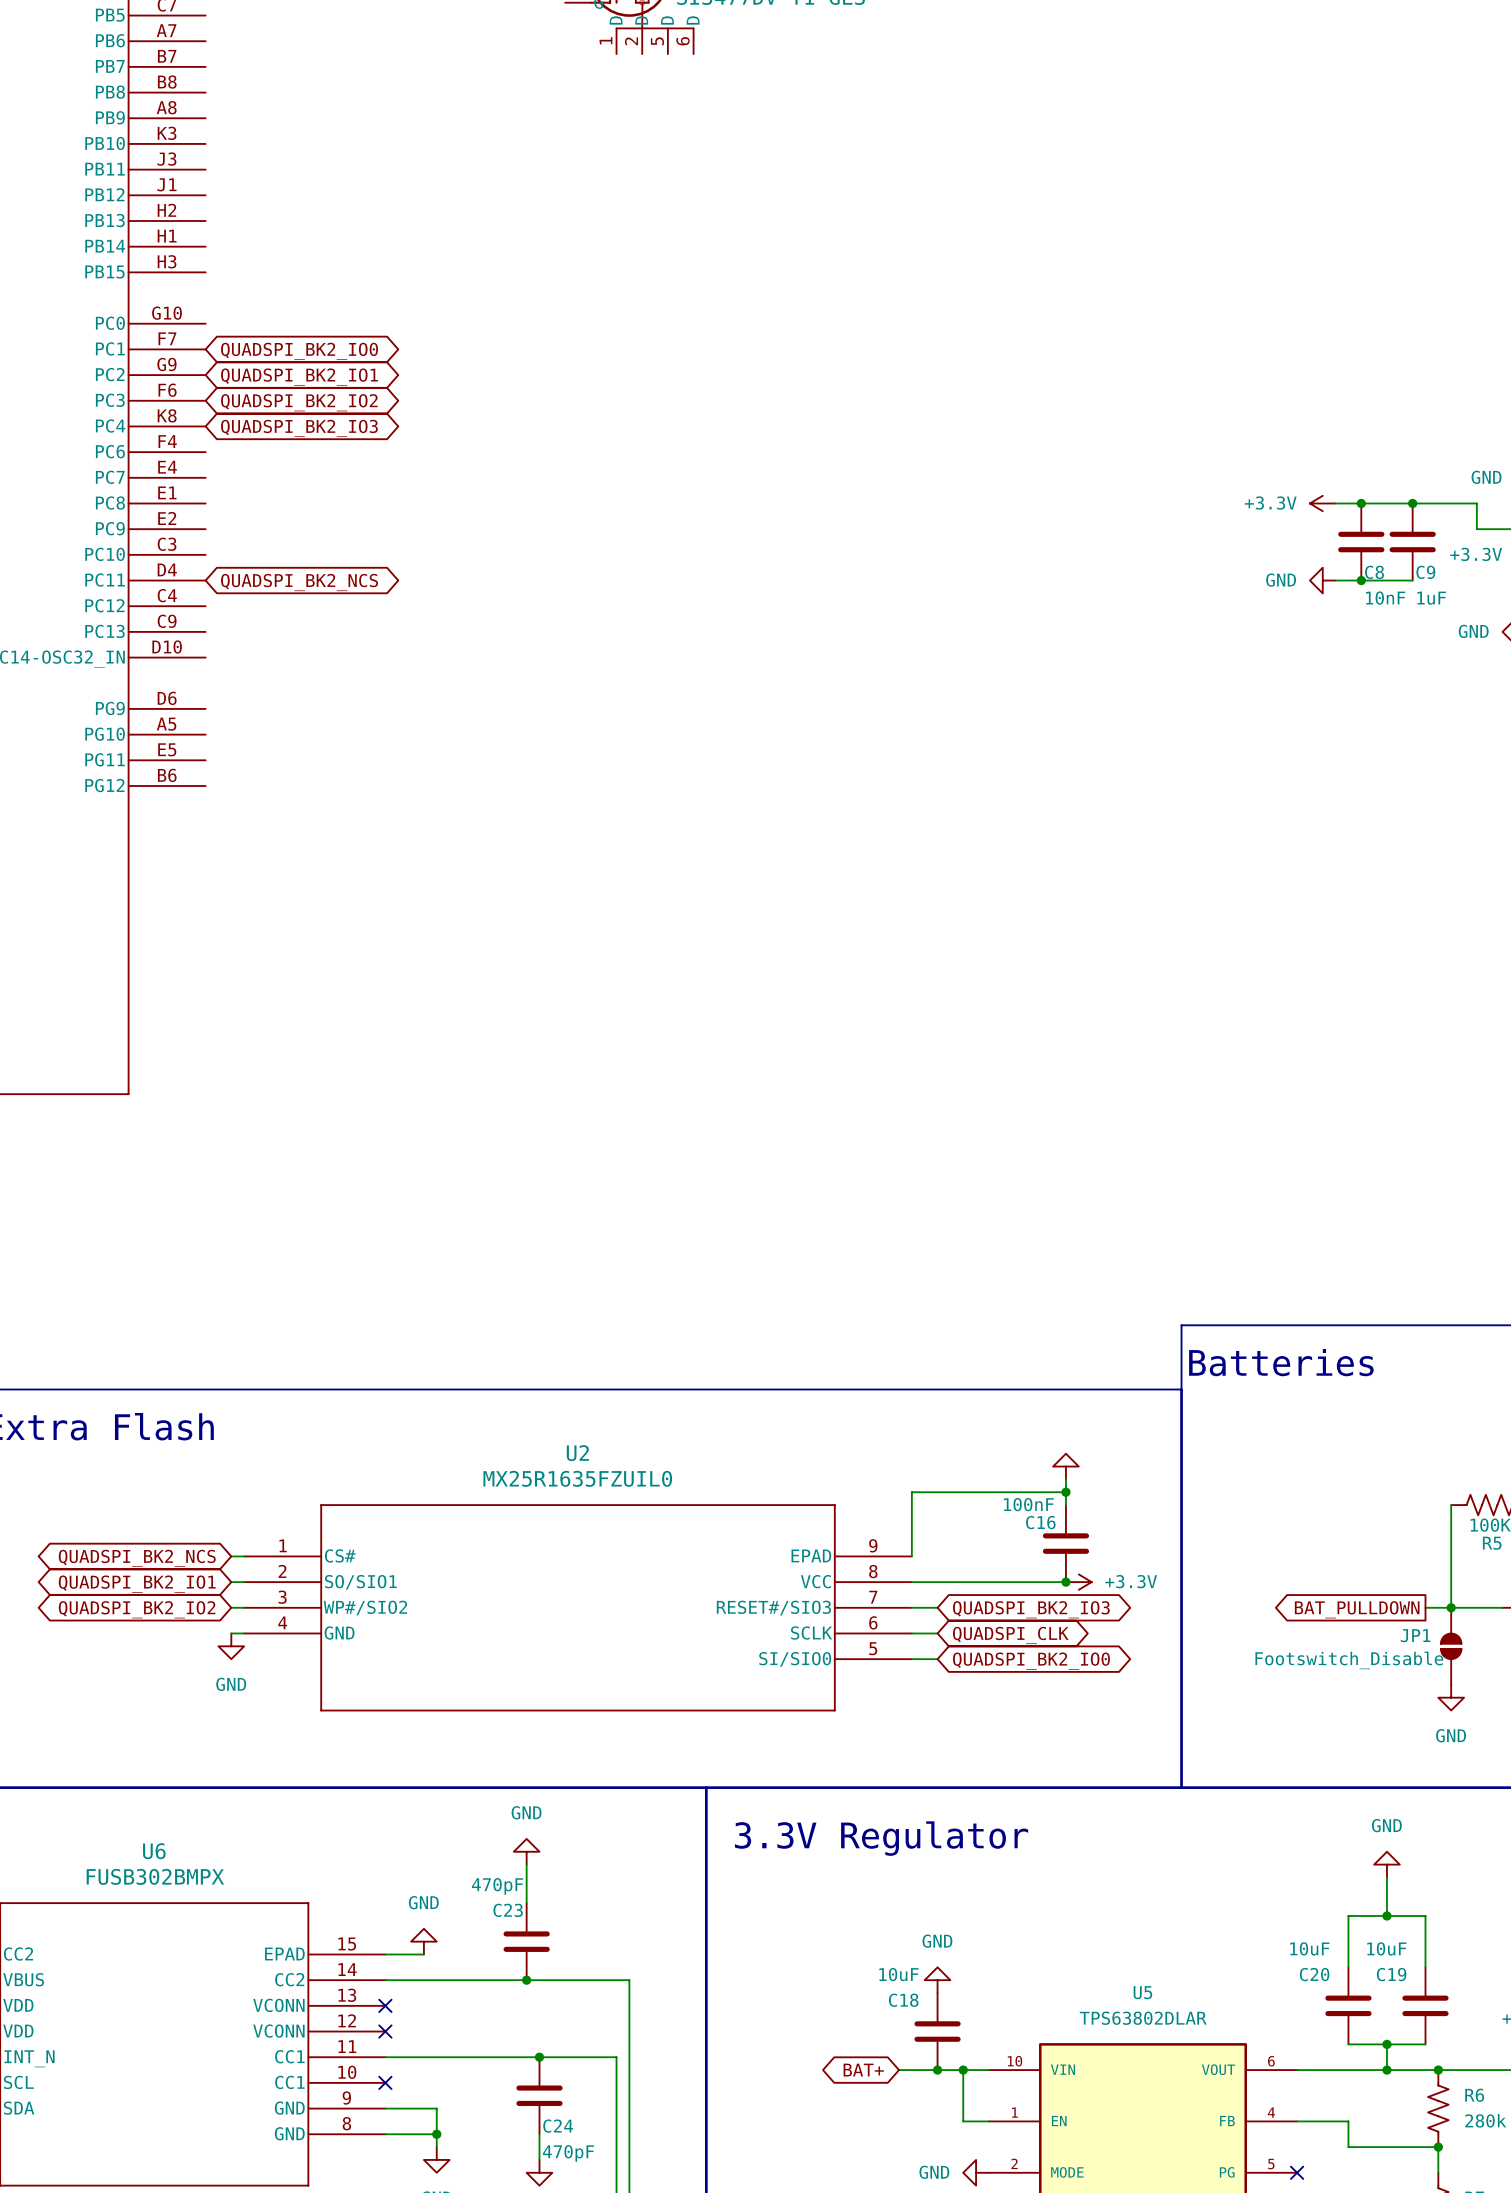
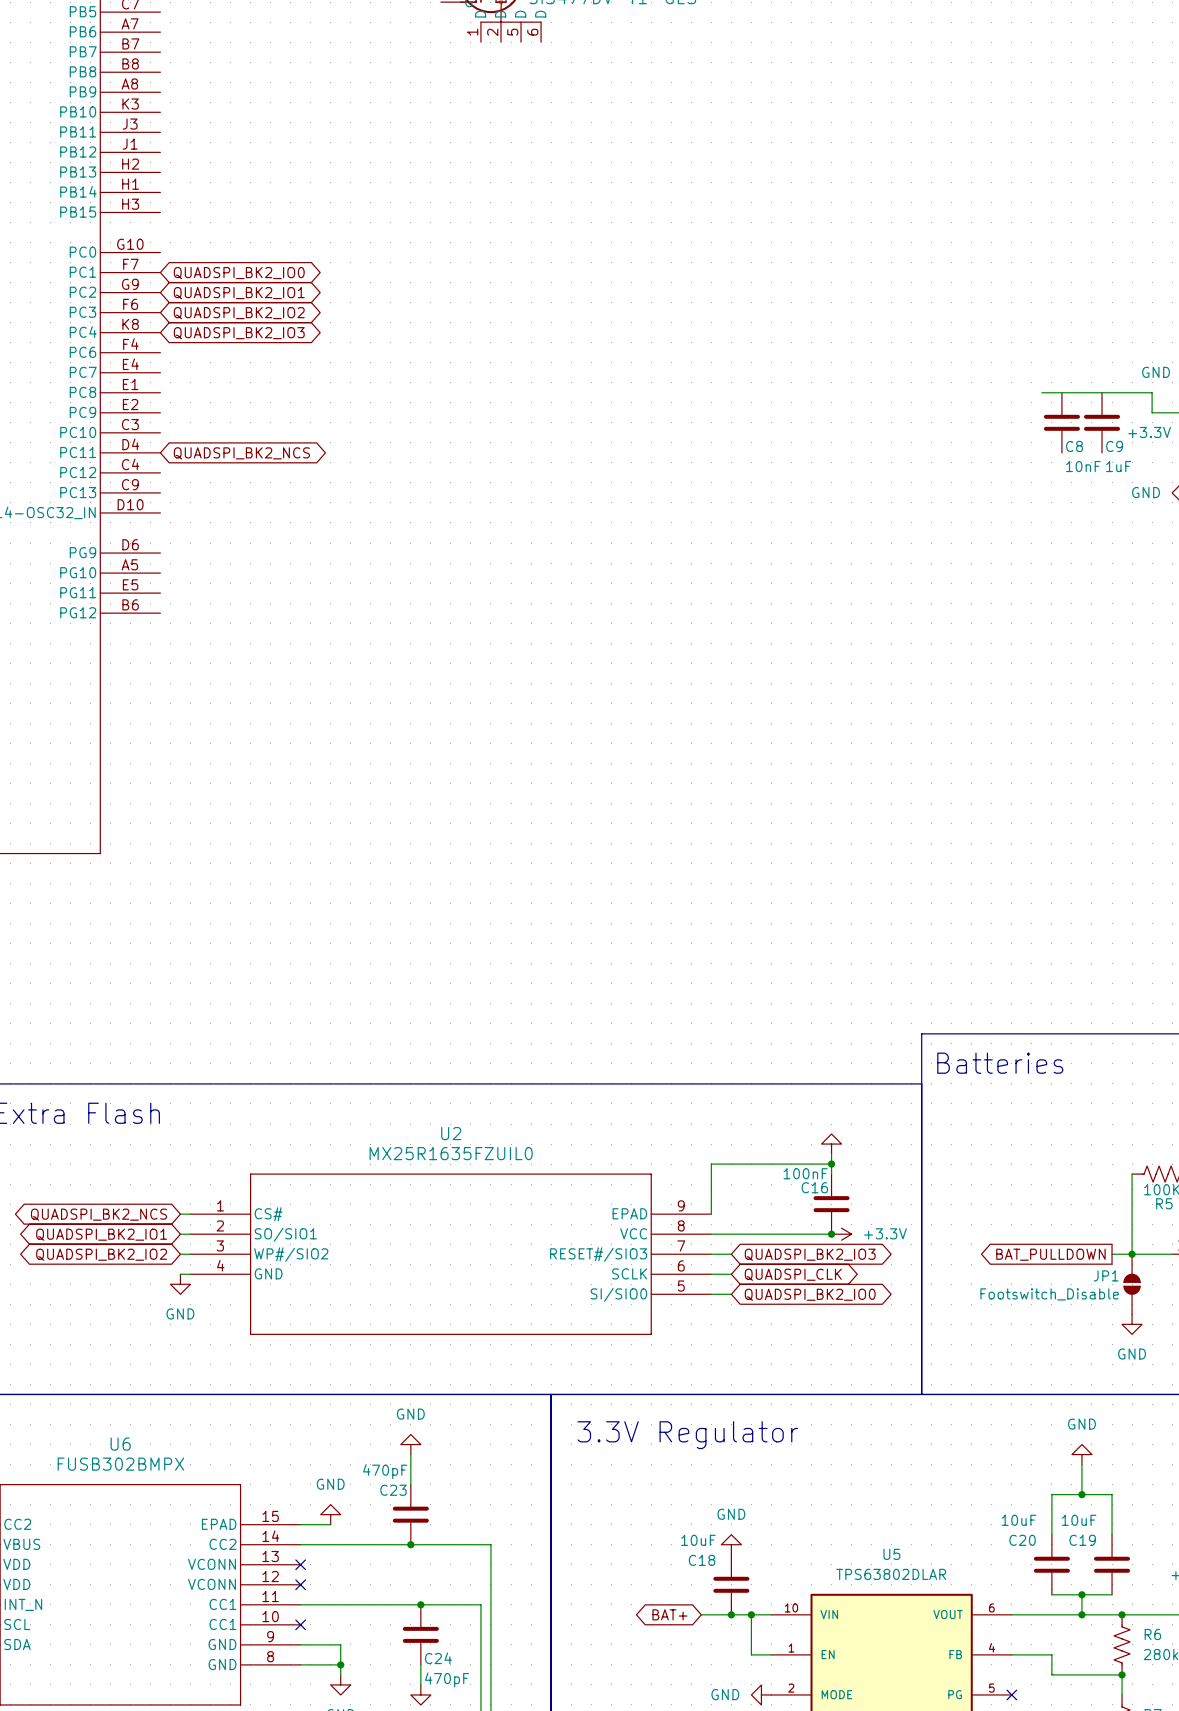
power symbol: +3.3V (1322, 503) -> none
junction: (1361, 503) -> none
junction: (1412, 503) -> none
power symbol: GND (1322, 580) -> none
wire: (1335, 580) (1412, 580) -> none
junction: (1361, 580) -> none

